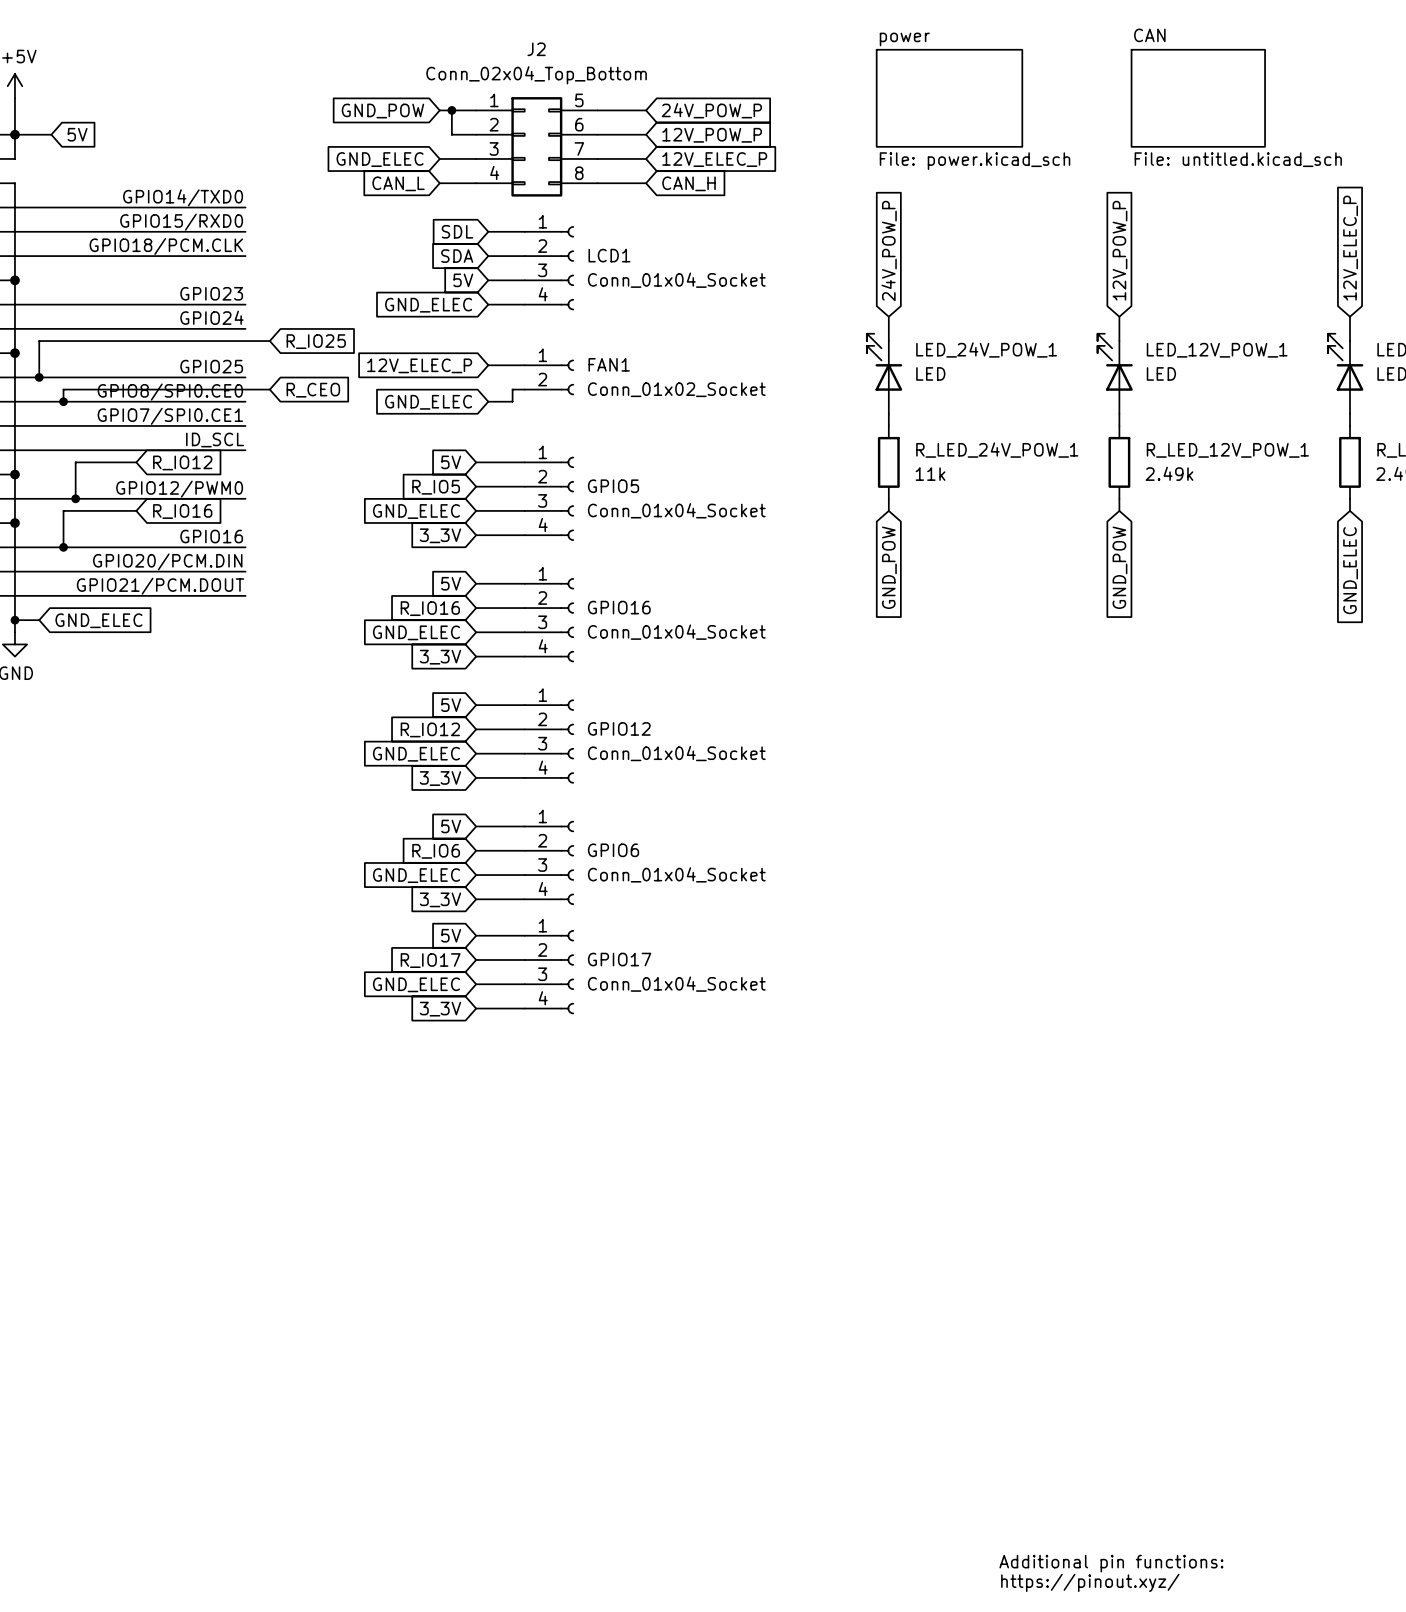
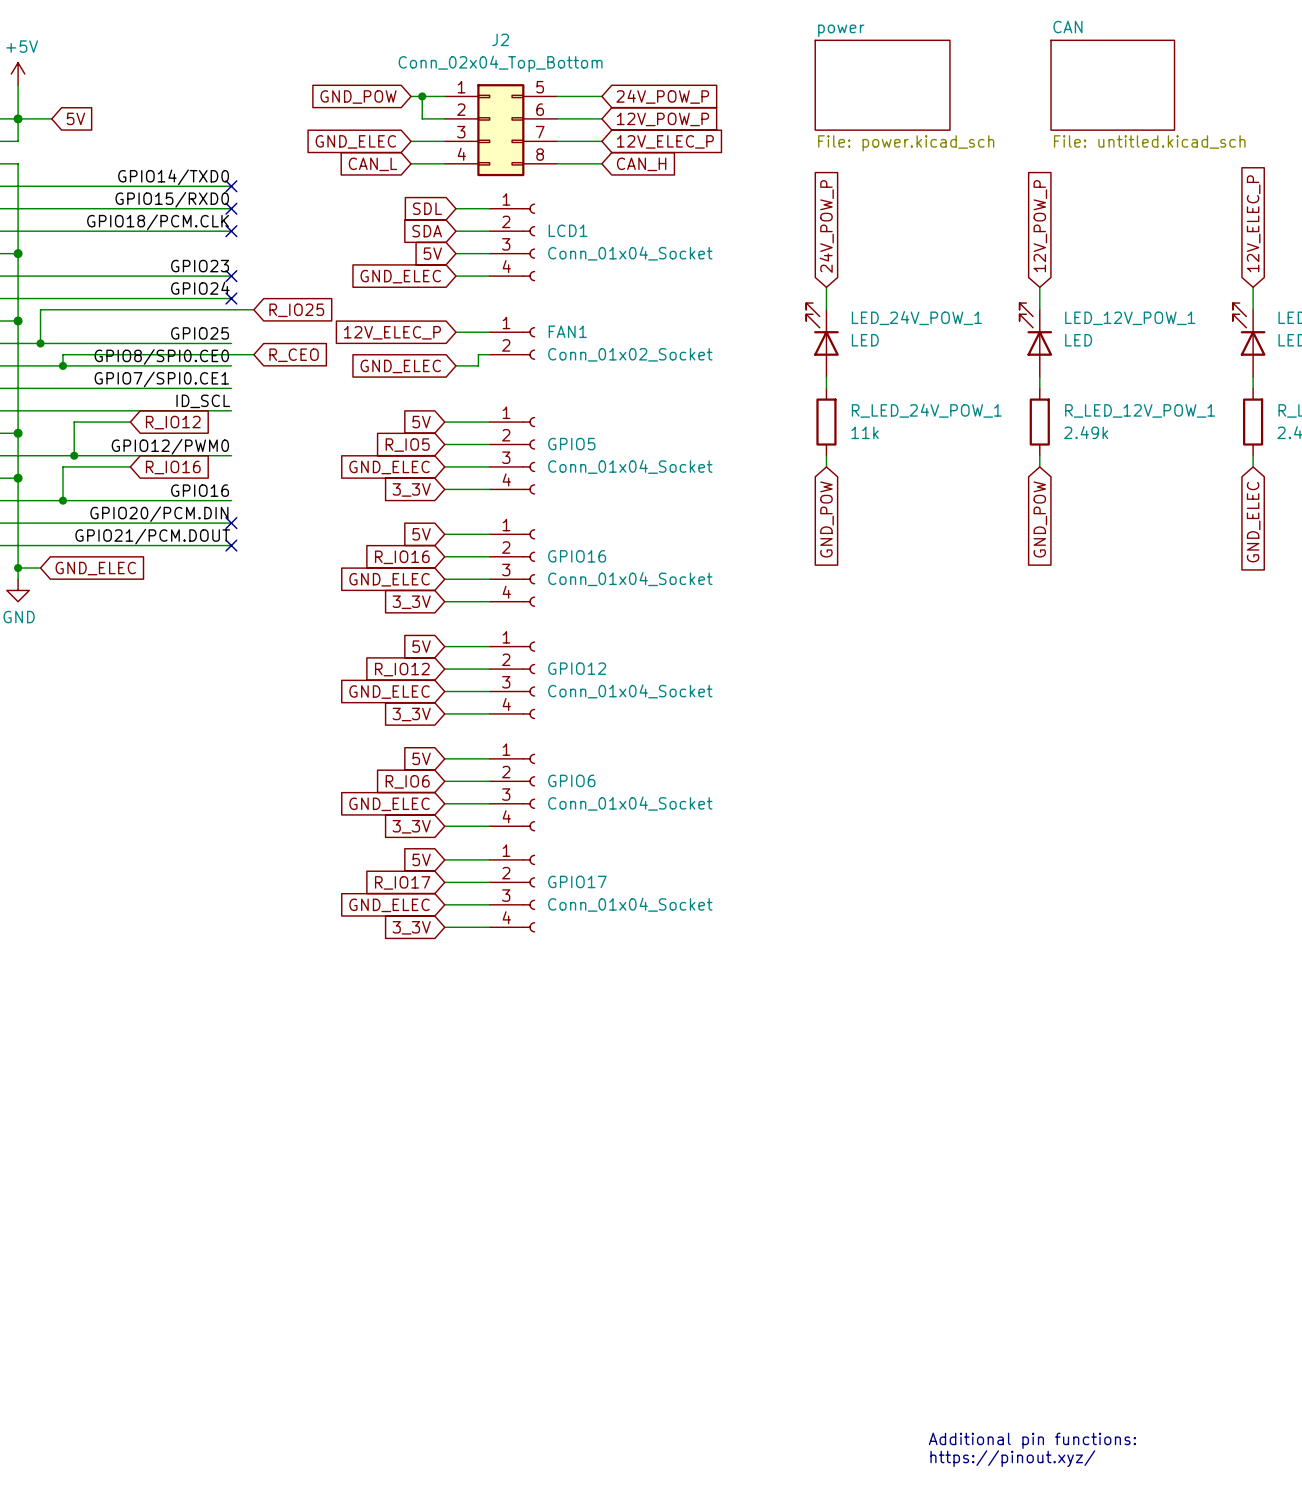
no-connect mark: none -> (231, 186)
no-connect mark: none -> (231, 208)
no-connect mark: none -> (231, 231)
no-connect mark: none -> (231, 276)
no-connect mark: none -> (231, 298)
no-connect mark: none -> (231, 523)
no-connect mark: none -> (231, 545)

